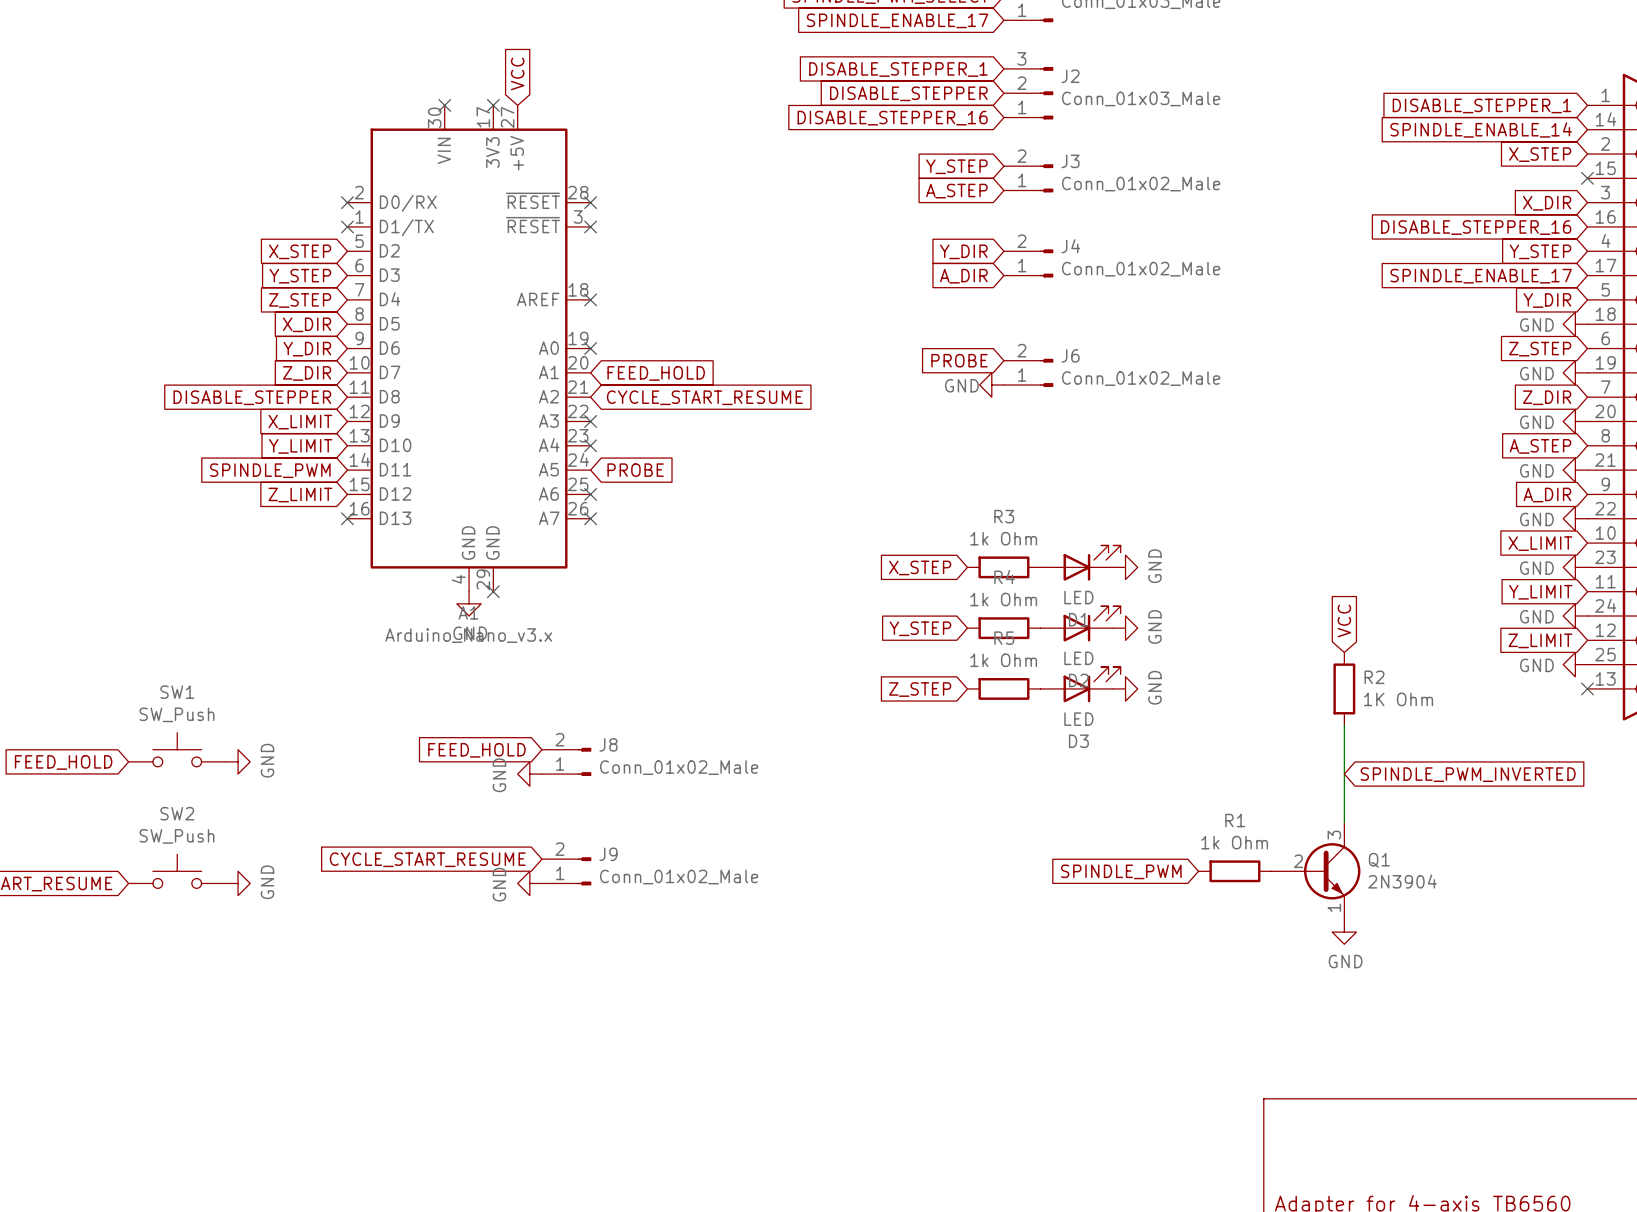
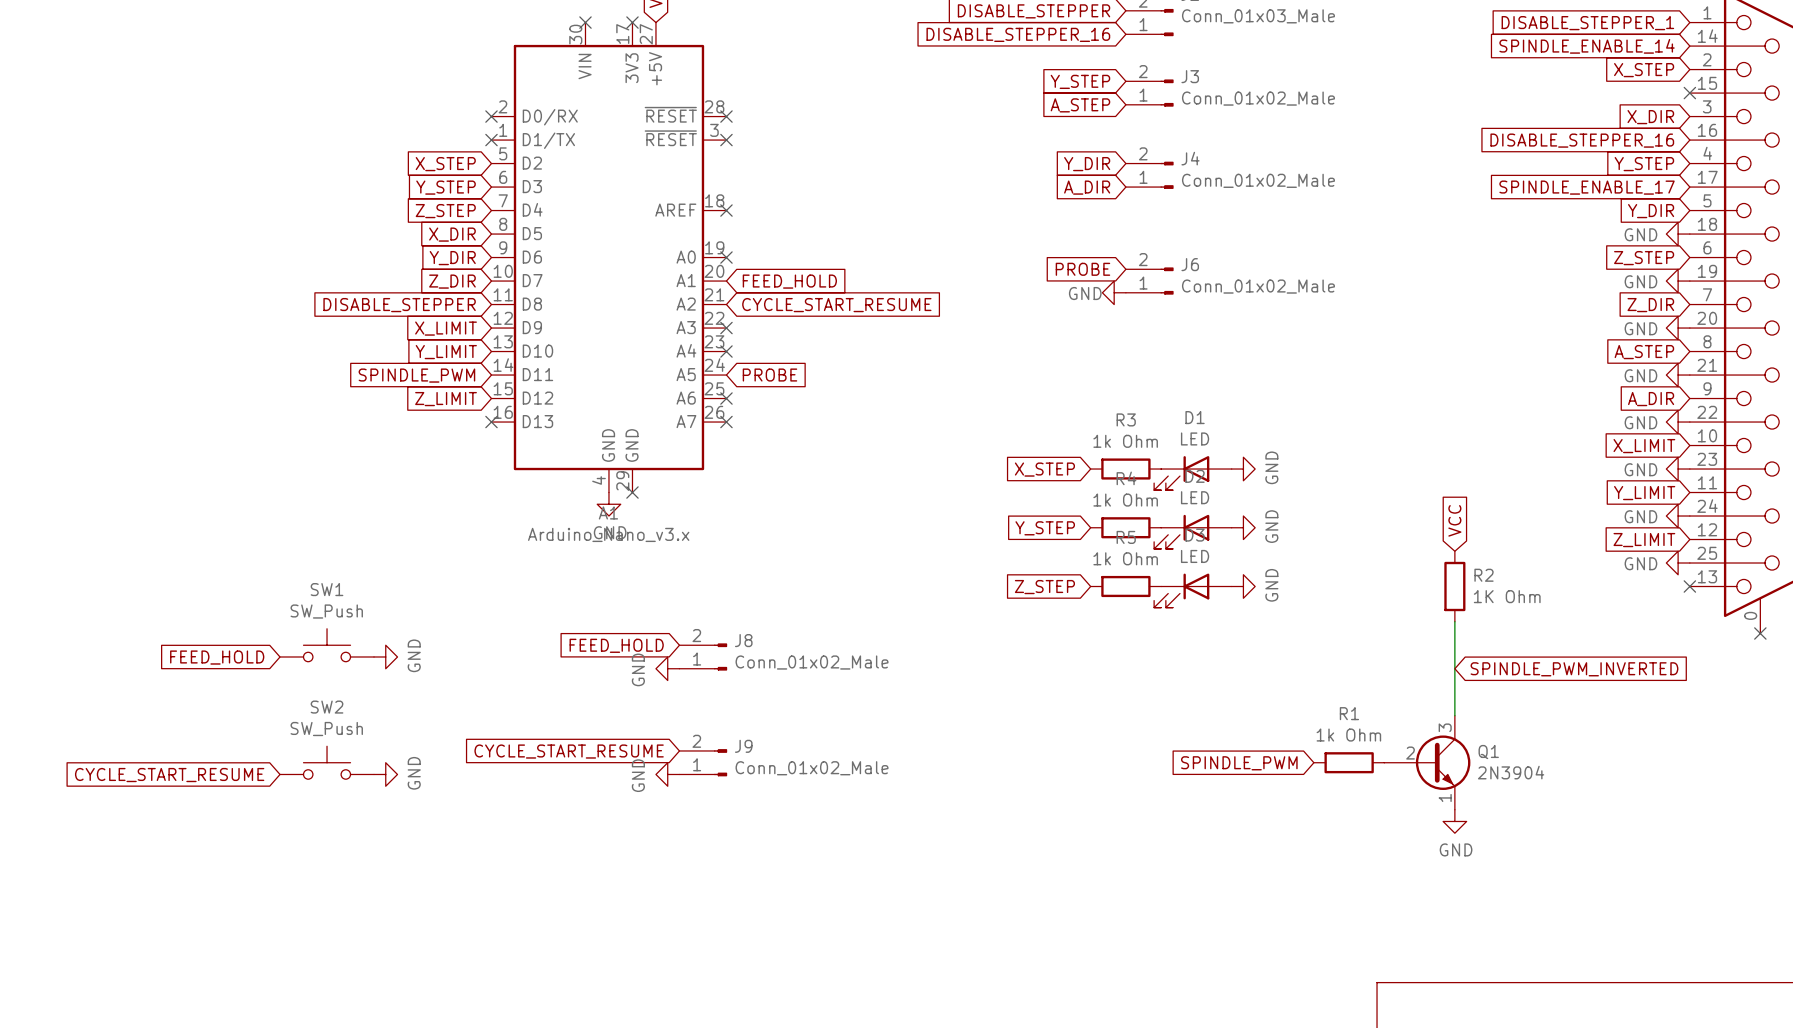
D1 rotation: 0° (1092, 563) -> 180° (1181, 473)
D2 rotation: 0° (1092, 623) -> 180° (1181, 531)
D3 rotation: 0° (1092, 684) -> 180° (1181, 590)

